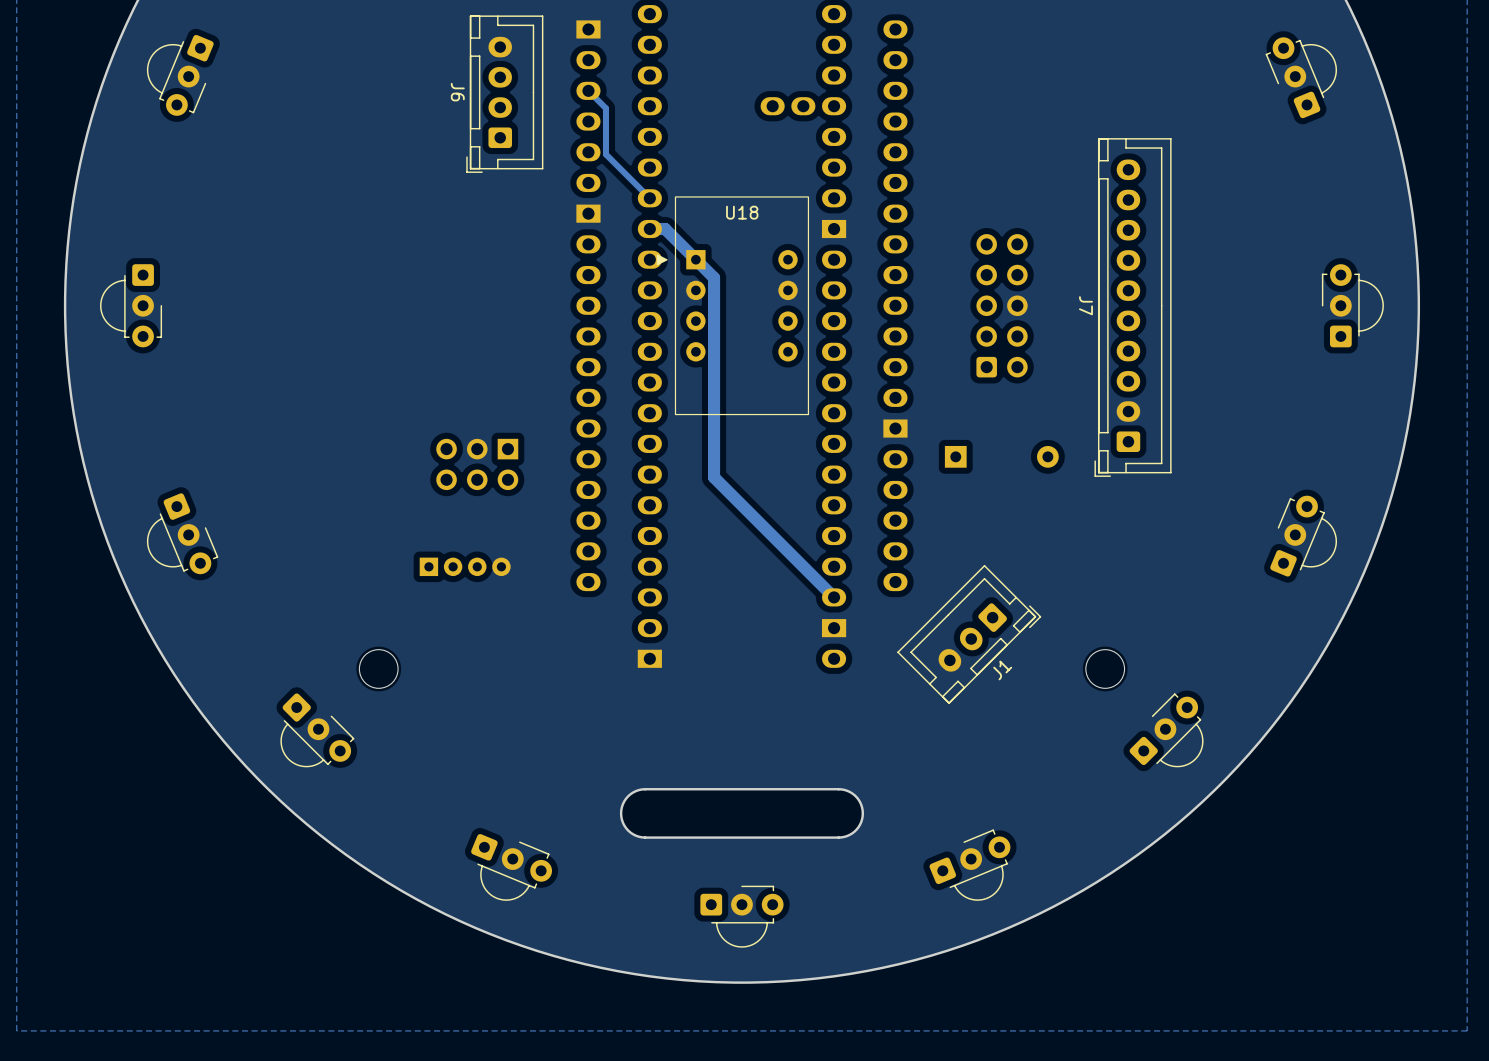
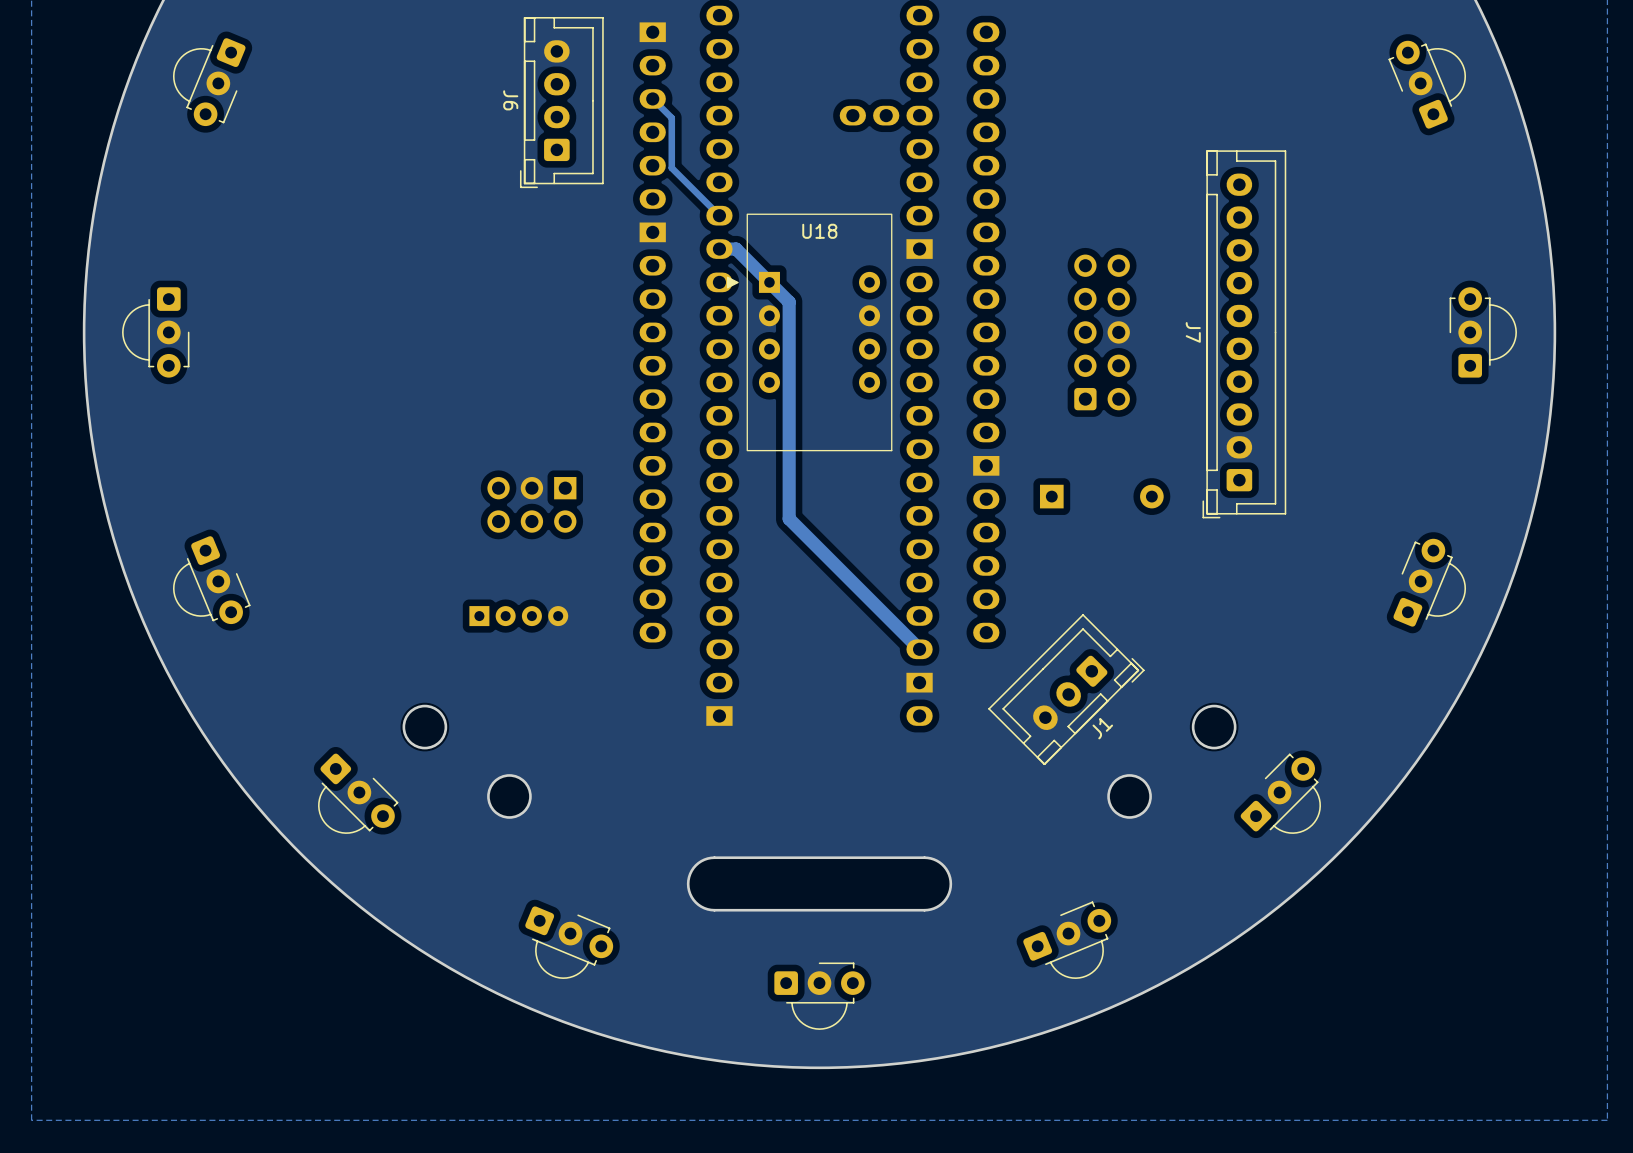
round board edge: none -> [402, 704, 448, 750]
round board edge: none -> [1191, 704, 1237, 750]
round board edge: none -> [487, 774, 532, 819]
round board edge: none -> [1107, 774, 1152, 819]

